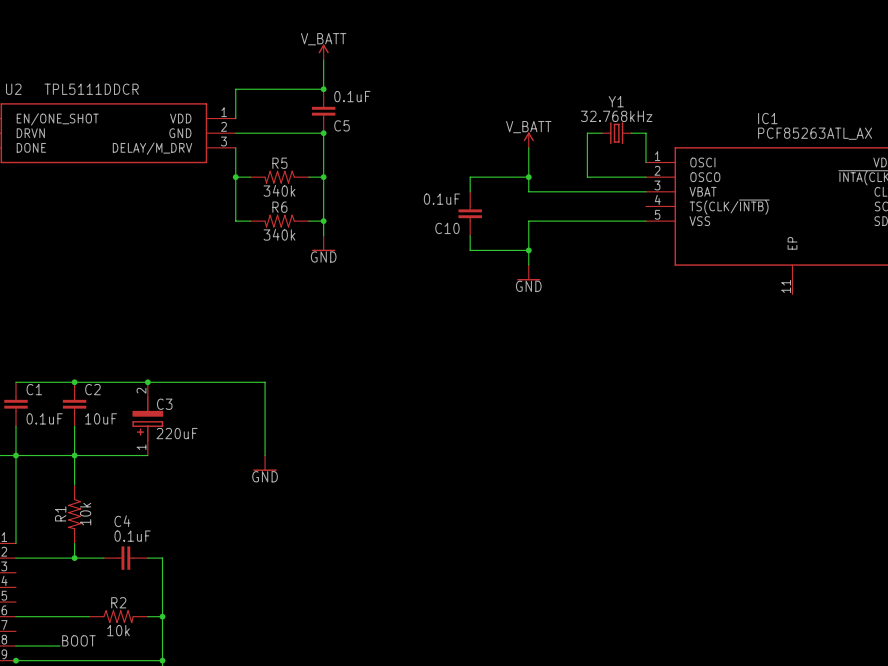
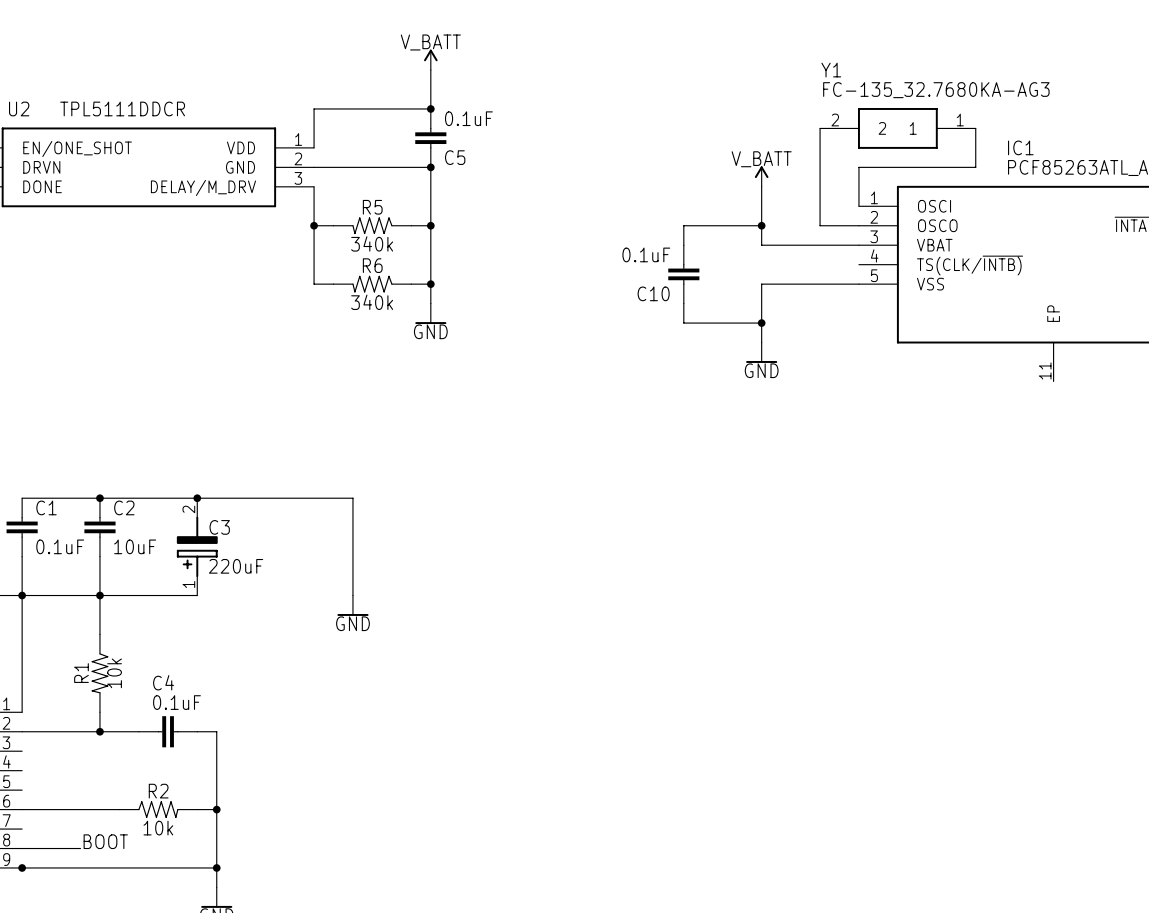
Y1 name position: Y1 (616, 101) -> Y1 (831, 70)
Y1 value: 32.768kHz (616, 116) -> FC-135_32.7680KA-AG3 (936, 90)
Y1 symbol: [601, 122, 632, 145] -> [820, 108, 976, 149]
wire: (602, 133) (587, 133) (587, 177) (616, 177) -> (820, 128) (820, 225)
wire: (631, 133) (645, 133) -> (975, 128) (975, 167) (858, 167)
power symbol position: V_BATT (528, 140) -> V_BATT (761, 176)
wire: (528, 147) (528, 191) (572, 191) -> (761, 186) (761, 245)
wire: (514, 177) (470, 177) (470, 191) -> (683, 225) (683, 245)
wire: none -> (703, 225) (761, 225)
junction: (528, 177) -> none
junction: none -> (761, 225)
C10 position: (470, 213) -> (683, 274)
wire: (572, 221) (528, 221) (528, 265) -> (761, 284) (761, 342)
wire: (470, 235) (470, 250) (514, 250) -> (683, 303) (683, 323)
wire: none -> (703, 323) (761, 323)
junction: (528, 250) -> none
junction: none -> (761, 323)
power symbol position: GND (528, 272) -> GND (761, 352)

